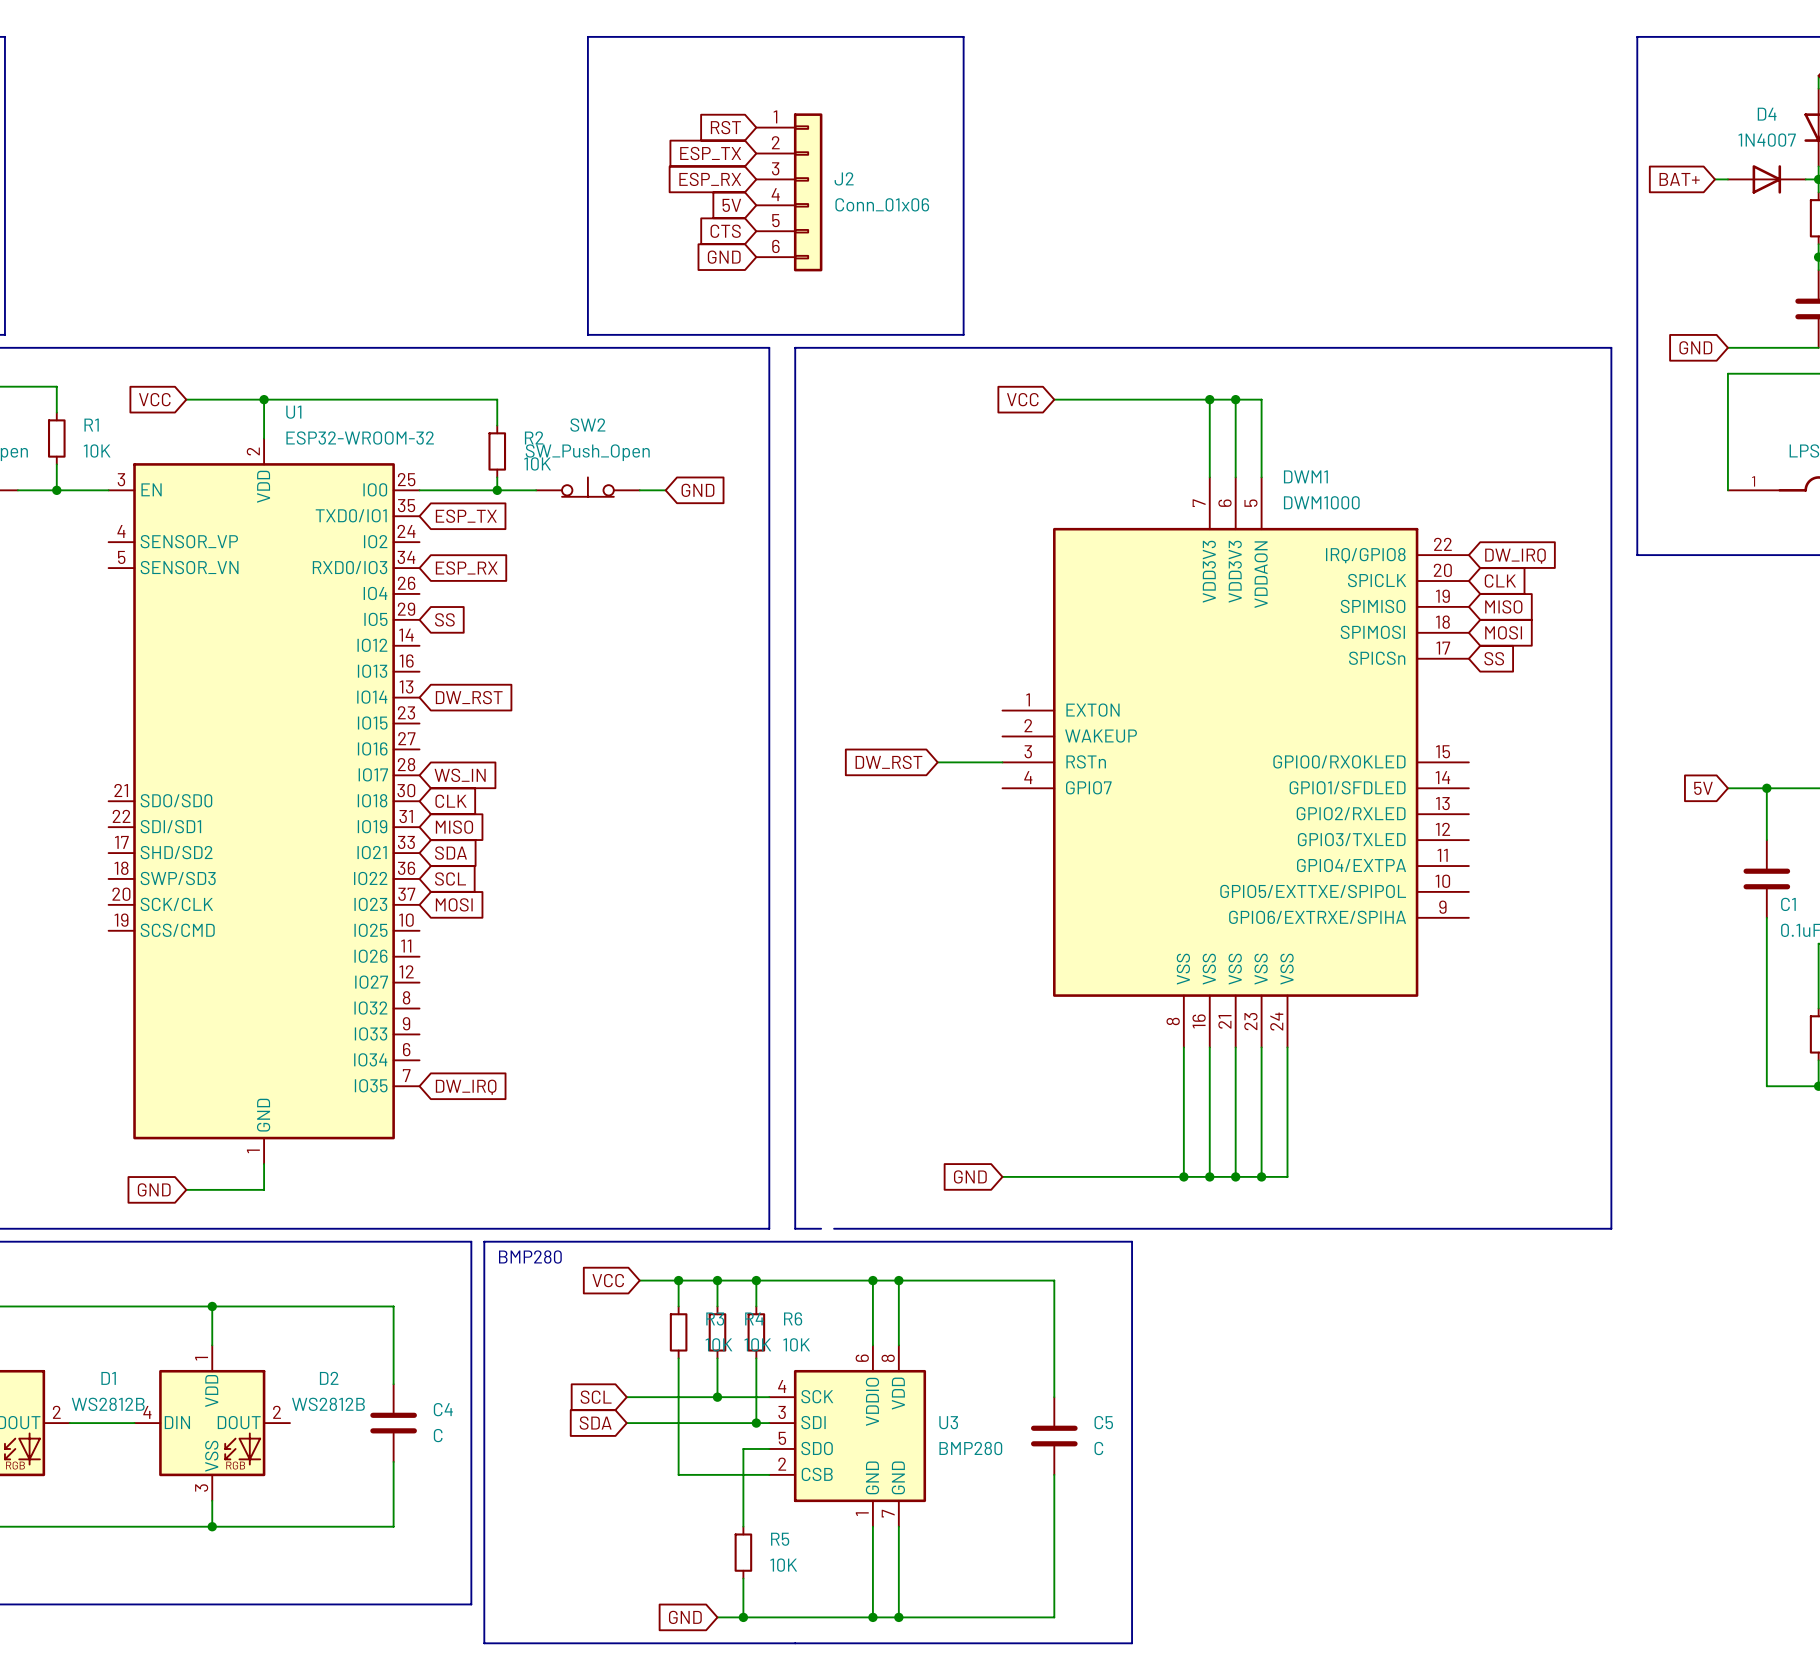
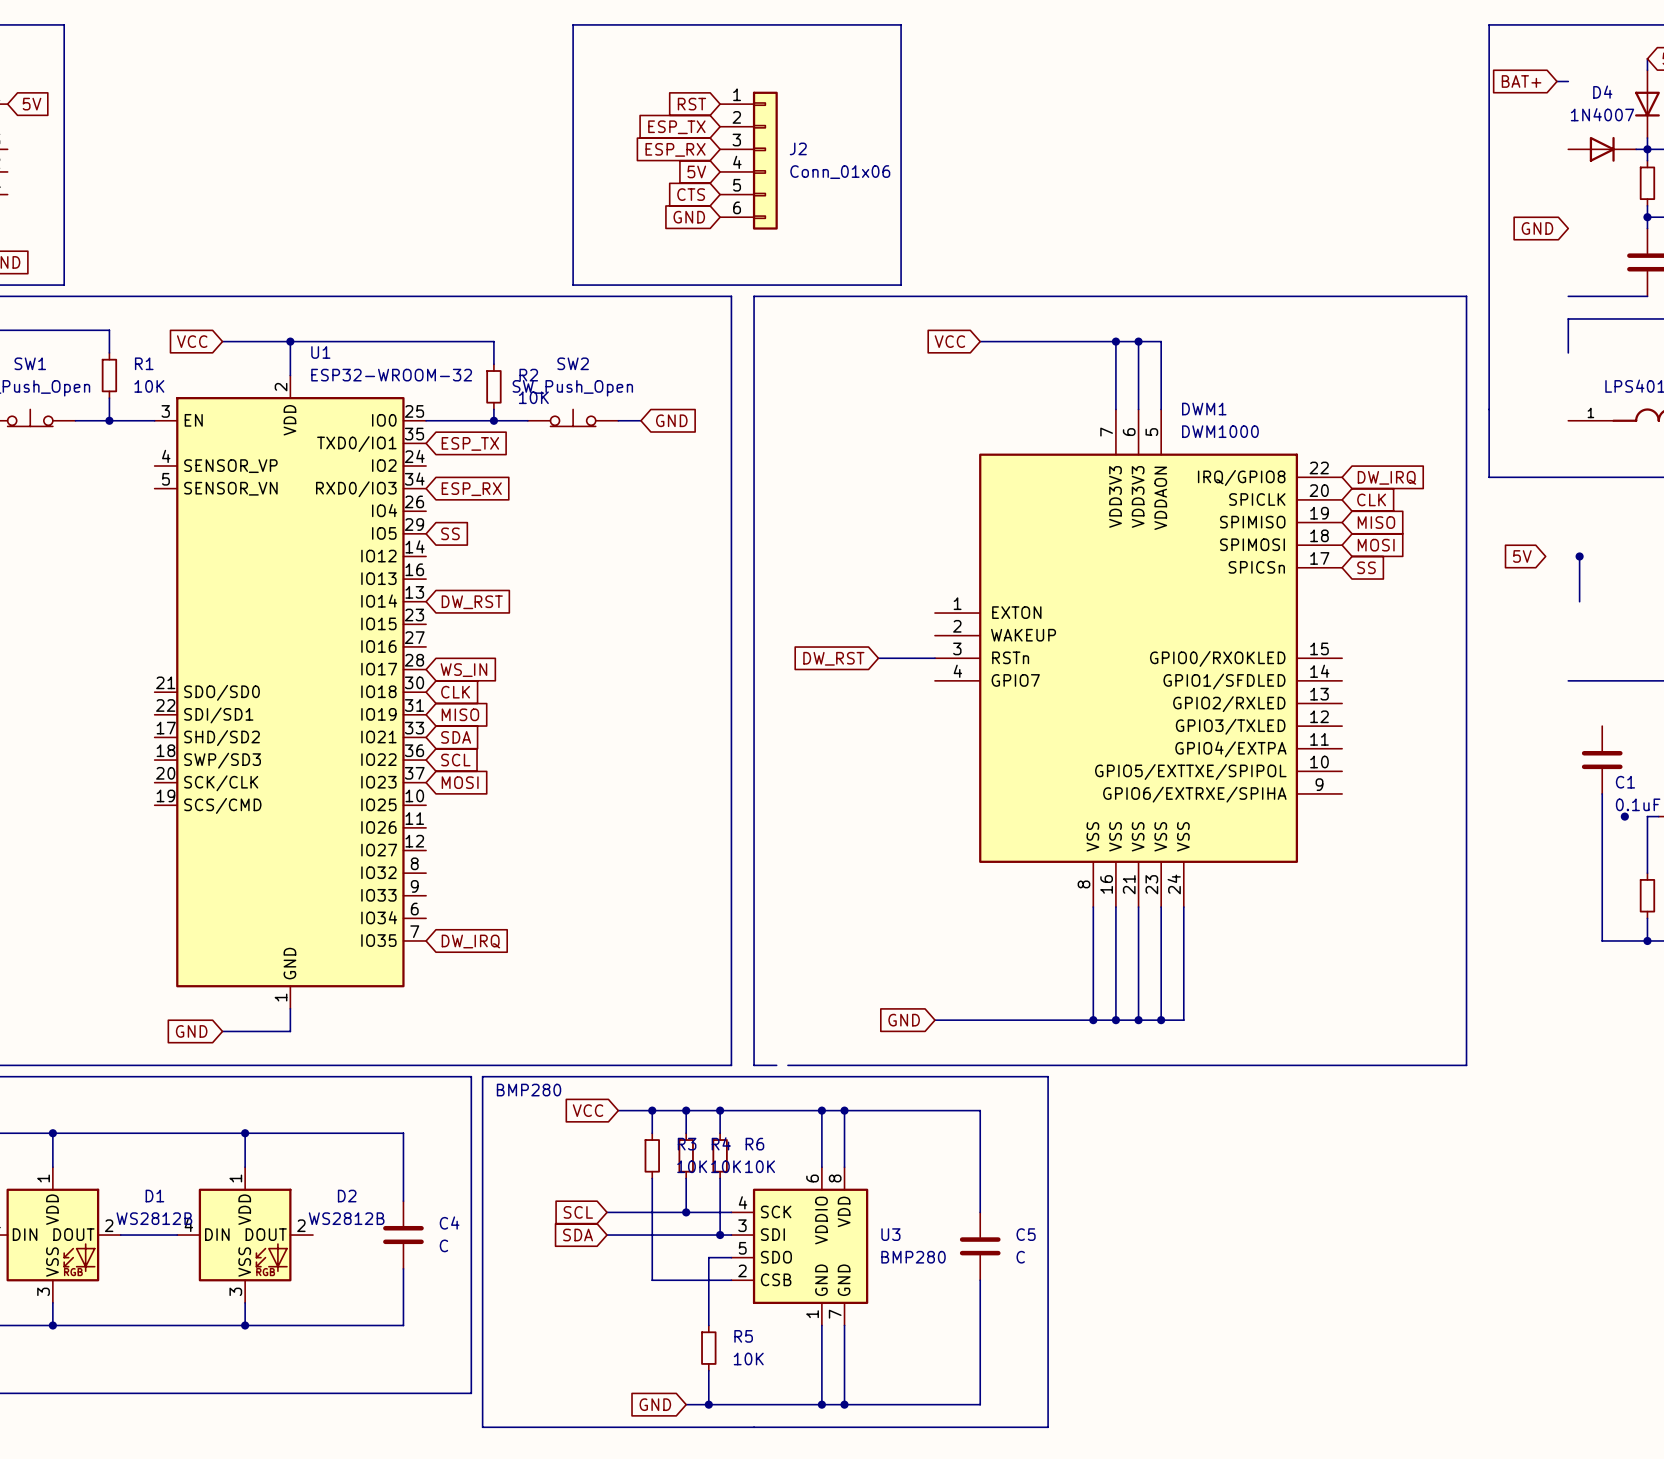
global label position: BAT+ (1679, 179) -> BAT+ (1521, 81)
wire: (1715, 179) (1727, 179) -> (1556, 81) (1568, 81)
global label position: GND (1695, 347) -> GND (1537, 228)
wire: (1727, 412) (1727, 490) -> none
junction: none -> (1579, 556)
global label position: 5V (1703, 788) -> 5V (1522, 556)
wire: (1766, 788) (1766, 840) -> (1579, 556) (1579, 601)
junction: (1766, 788) -> none
junction: none -> (1624, 816)

